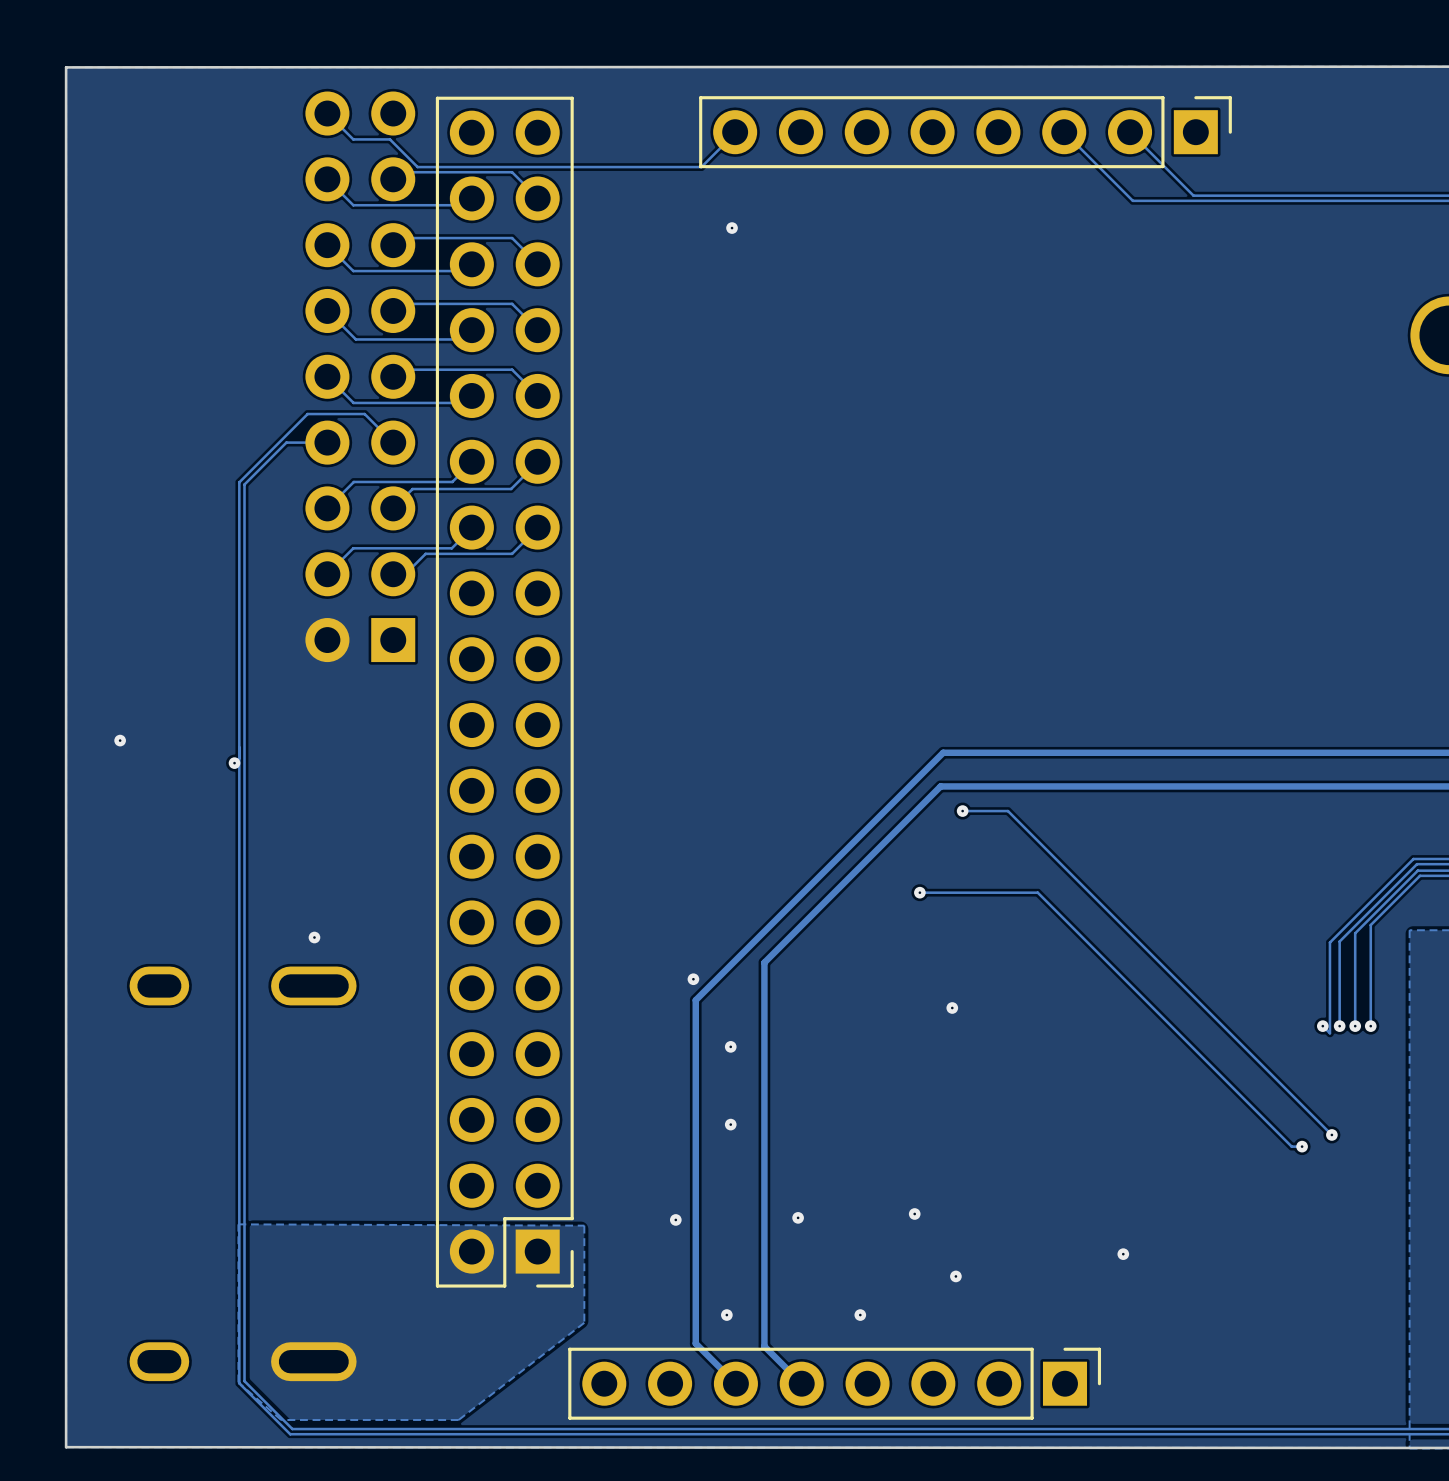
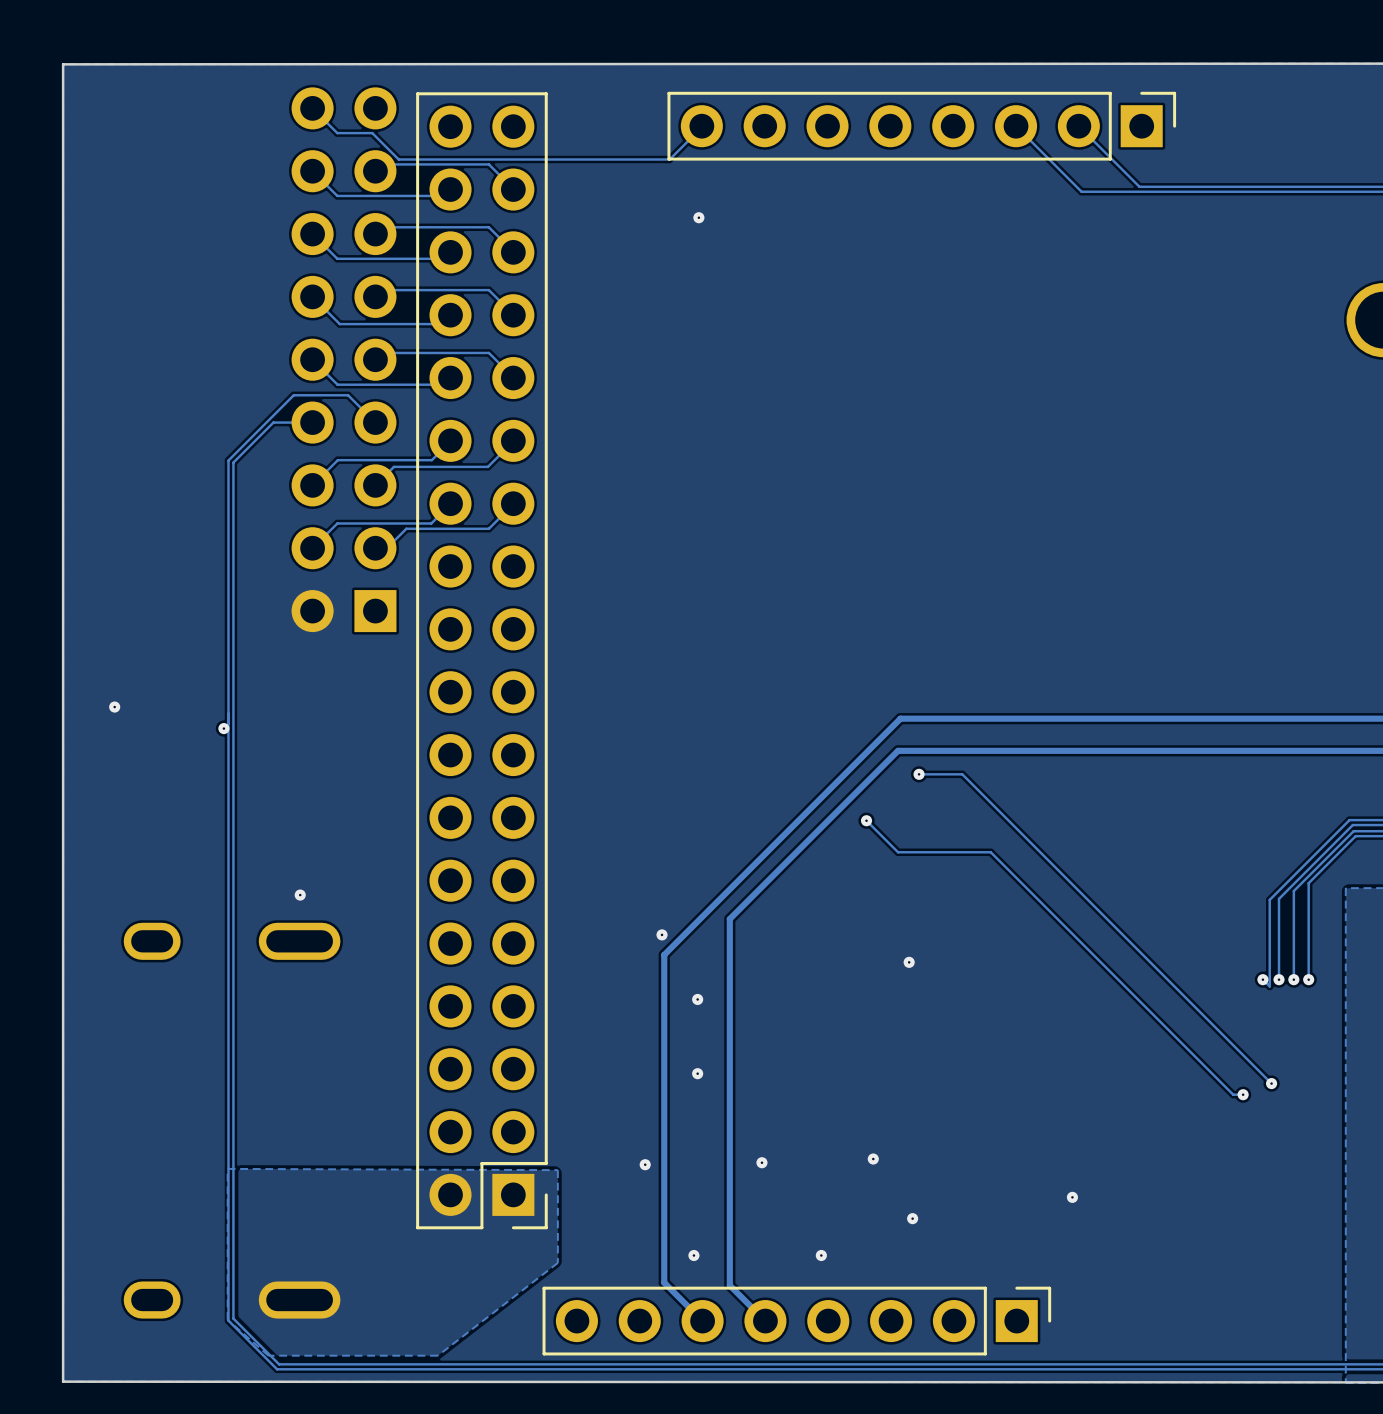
via position: (919, 892) -> (866, 820)
track: (940, 892) (919, 892) -> (898, 852) (866, 820)

